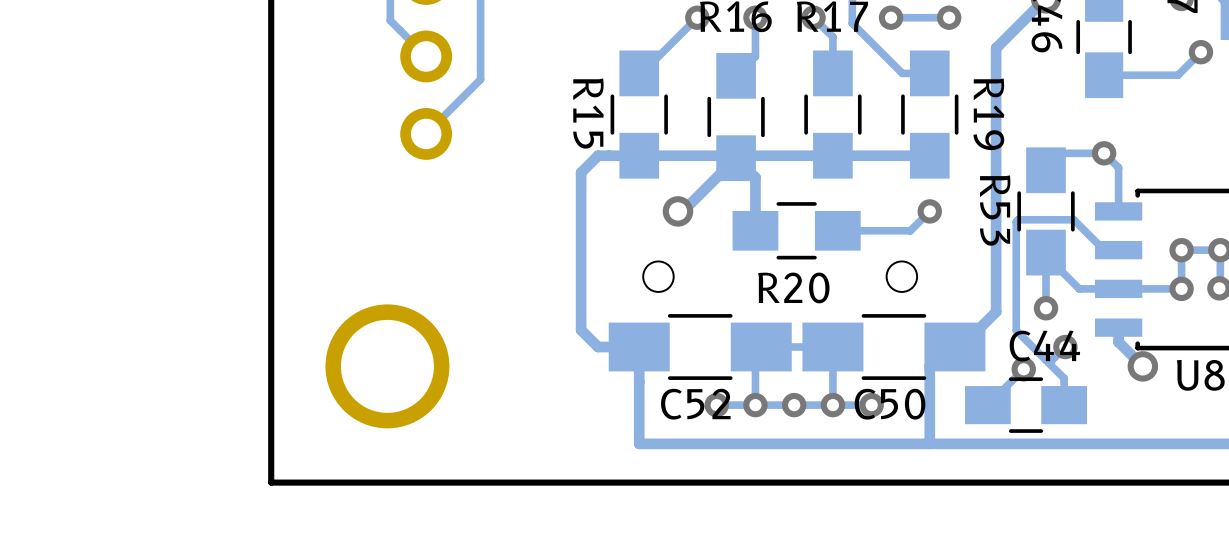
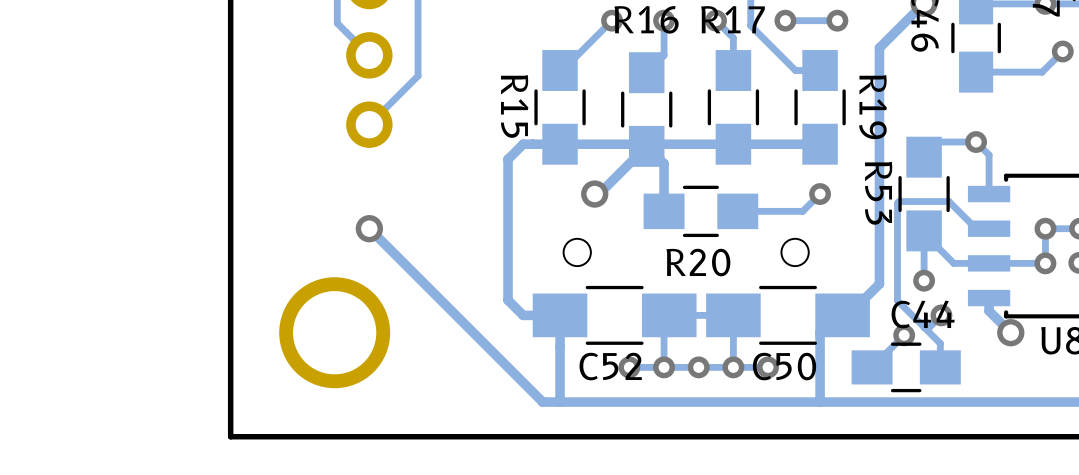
track: none -> (369, 228) (542, 402) (560, 402)
via: none -> (369, 228)

